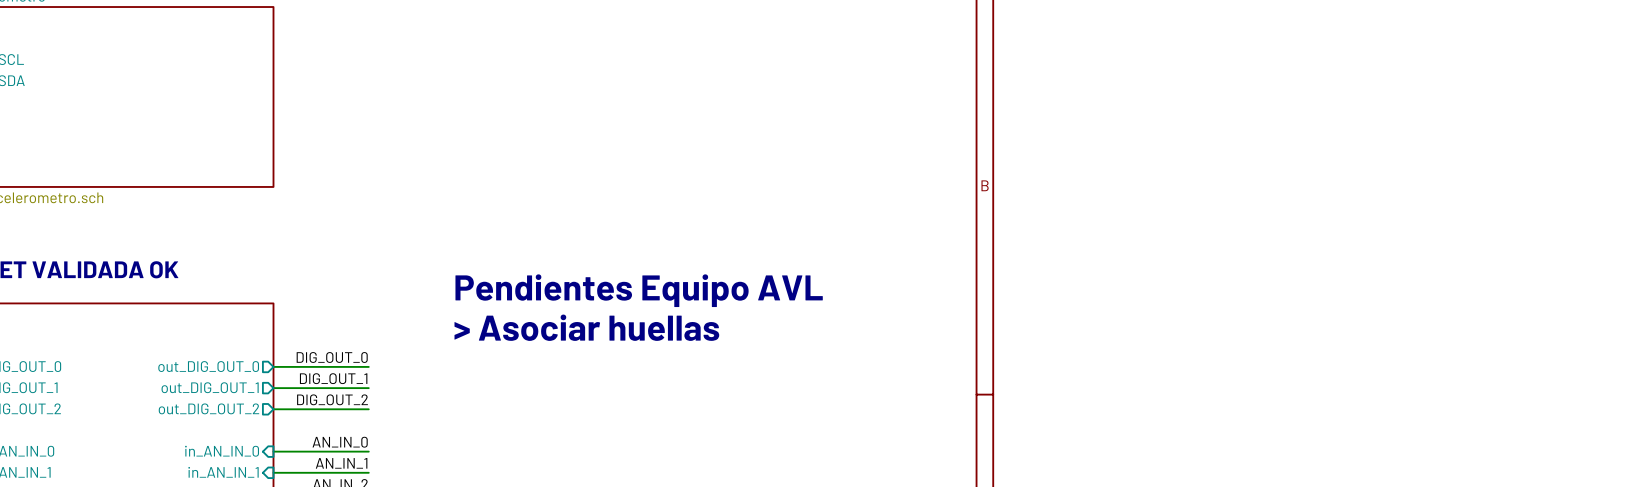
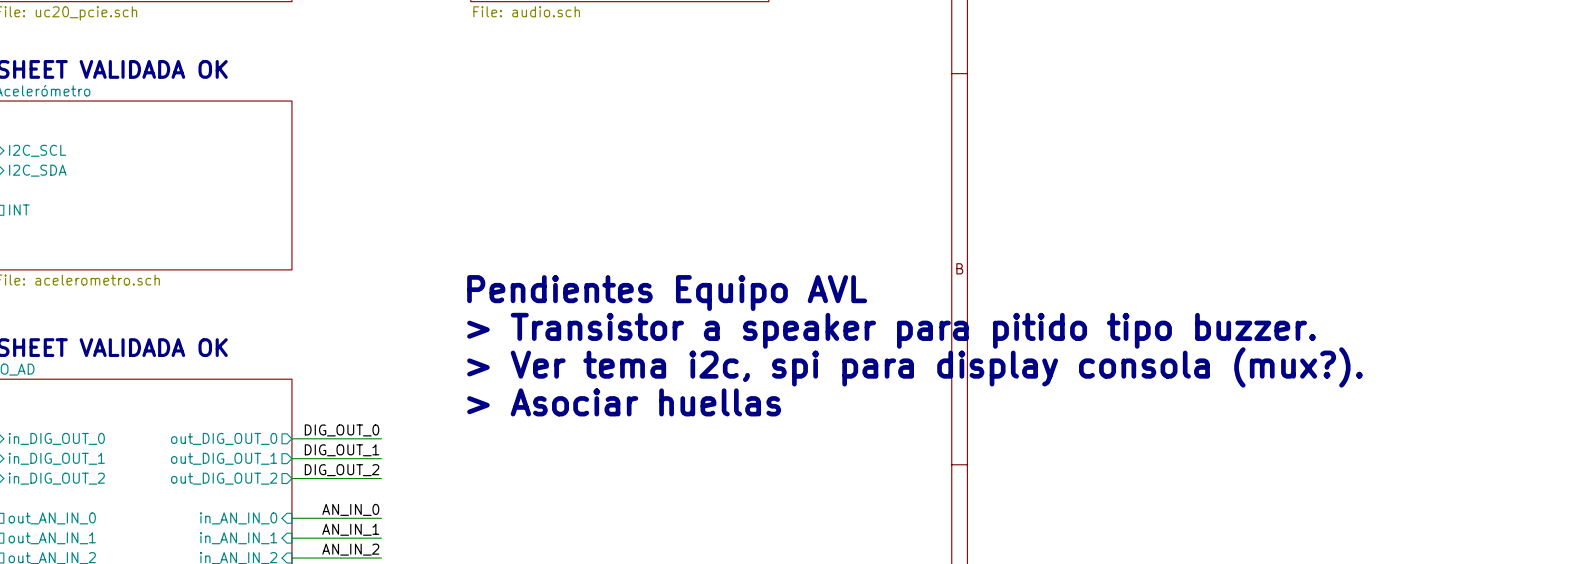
text: none -> Pendientes Equipo AVL (667, 293)
text: none -> > Transistor a speaker para pitido tipo buzzer. (891, 330)
text: Pendientes Equipo AVL (639, 290) -> > Ver tema i2c, spi para display consola (mux?). (915, 367)

